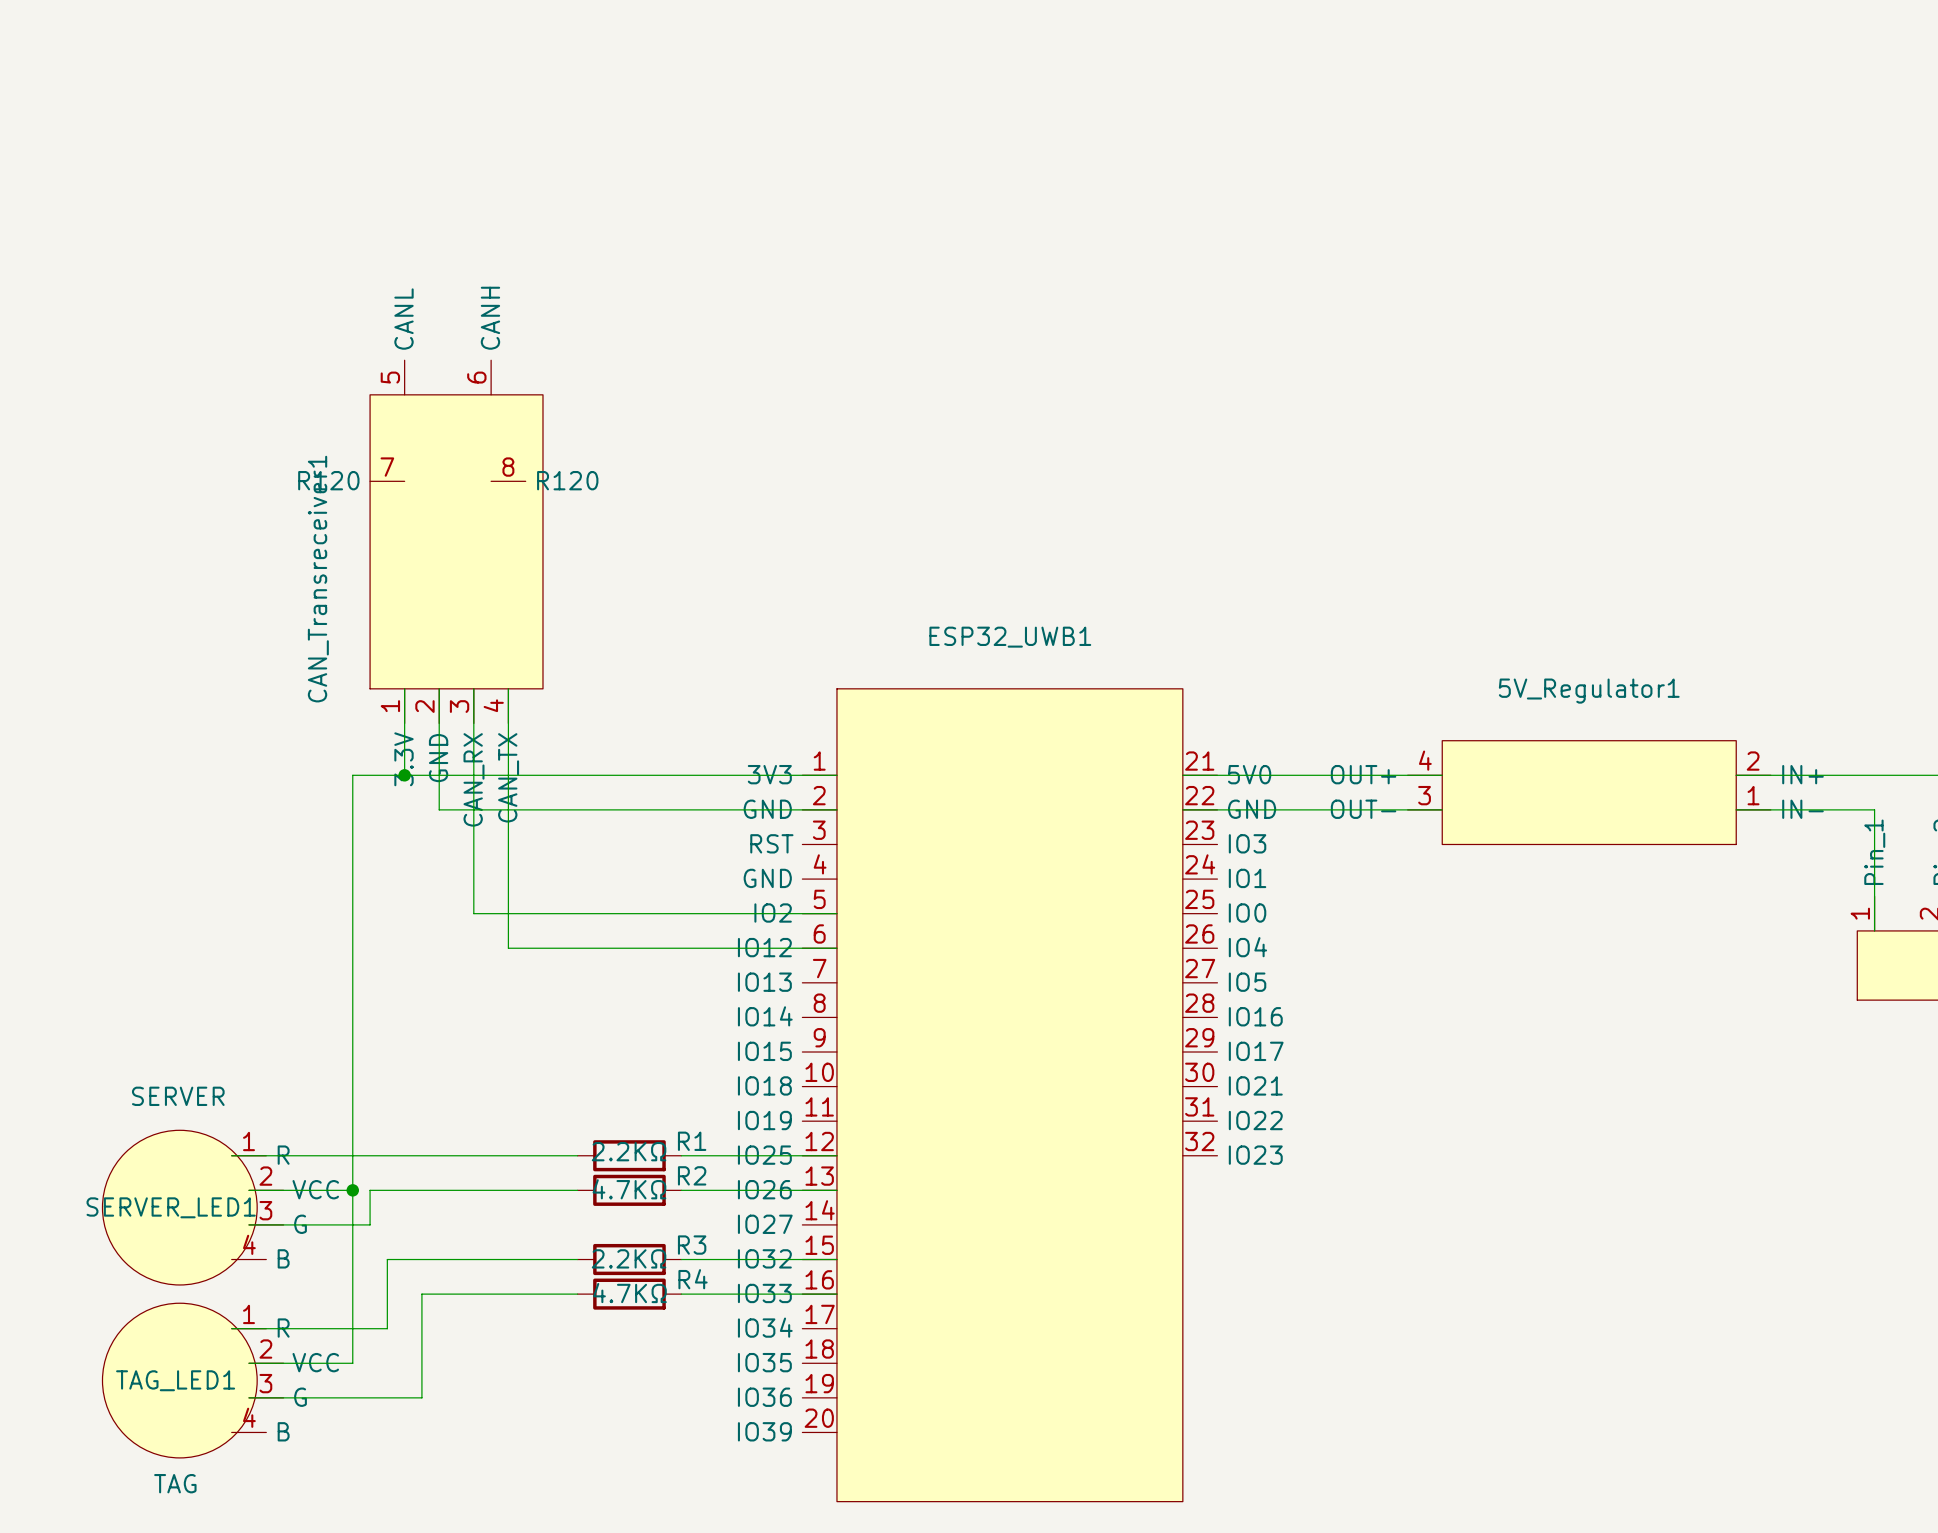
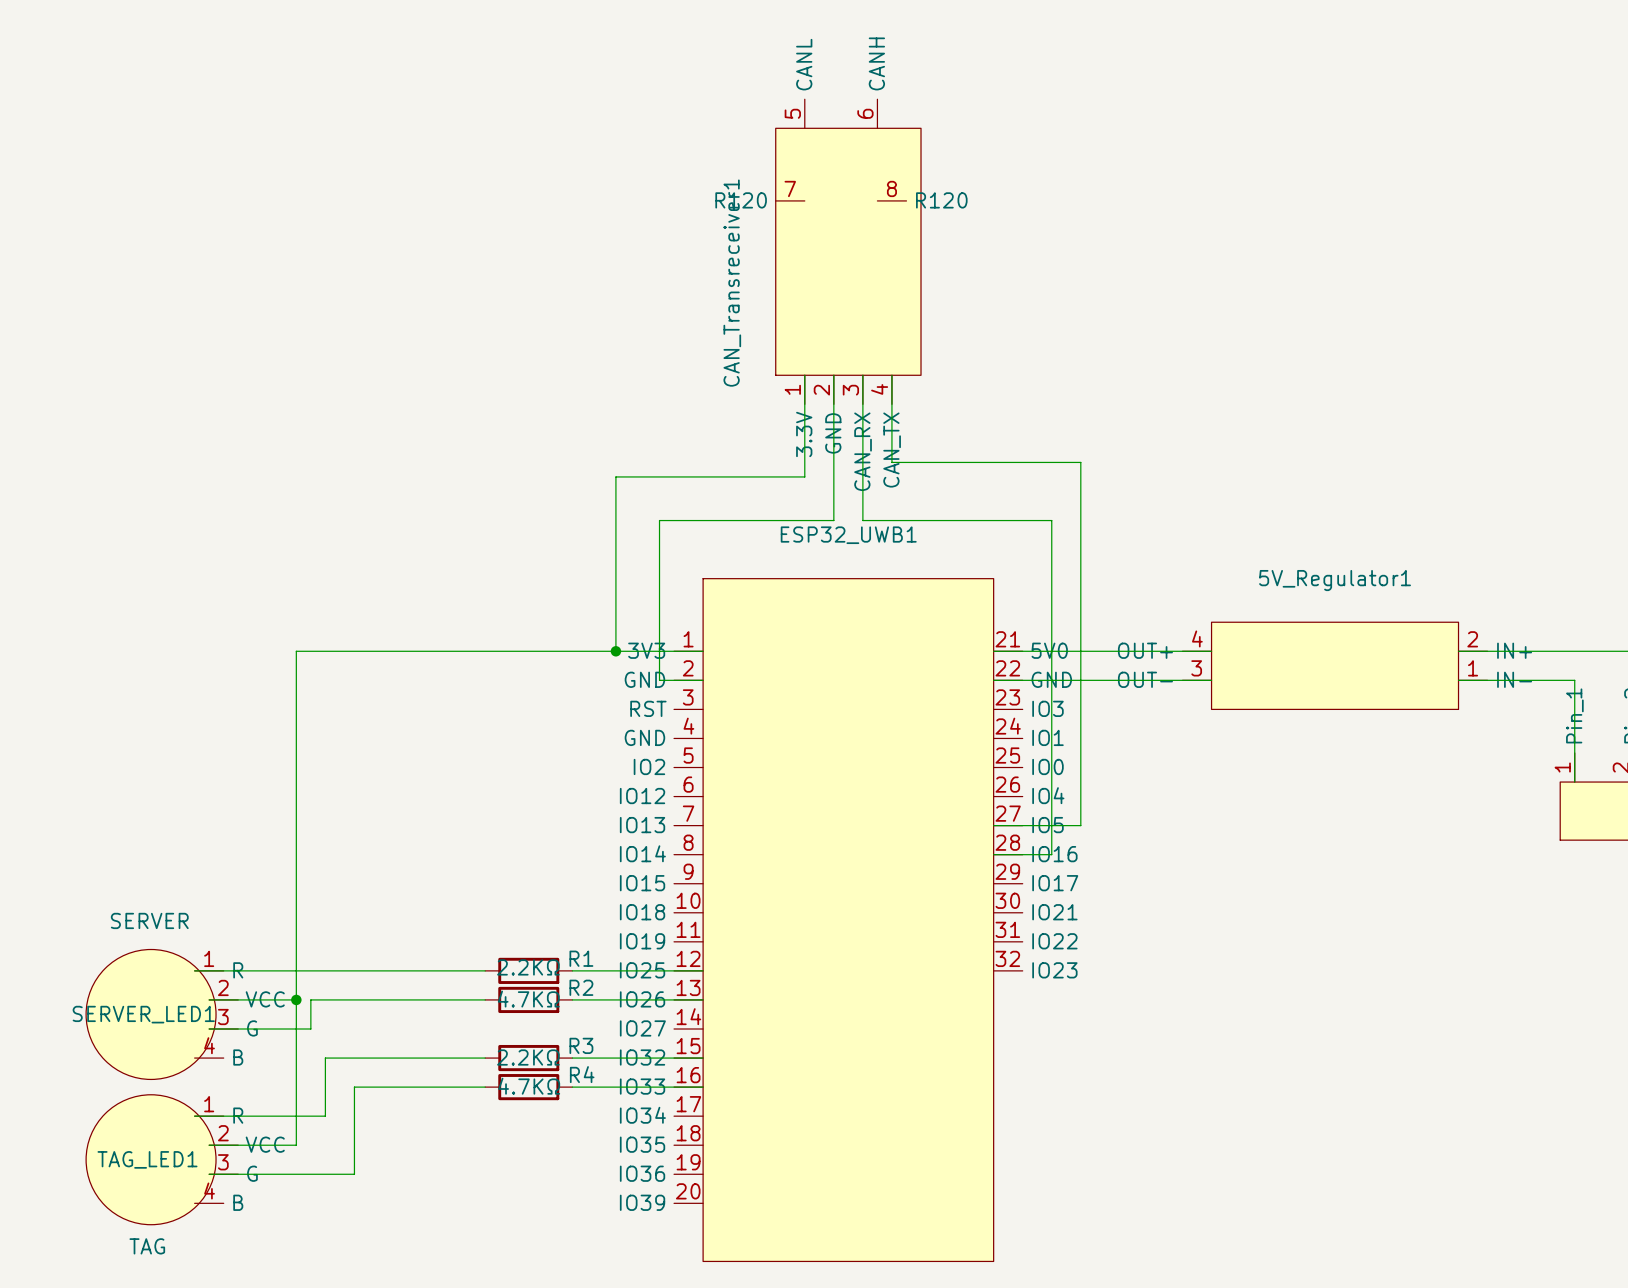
wire: none -> (804, 375) (804, 476) (615, 476) (615, 651)
wire: none -> (862, 375) (862, 520) (1051, 520) (1051, 854) (993, 854)
wire: none -> (891, 375) (891, 462) (1080, 462) (1080, 825) (993, 825)
CAN_Transreceiver1 position: (456, 541) -> (848, 251)
wire: (404, 688) (404, 775) -> none
wire: (439, 688) (439, 809) (785, 809) -> (833, 375) (833, 520) (659, 520) (659, 680)
wire: (473, 688) (473, 913) (836, 913) -> none
wire: (508, 688) (508, 948) (836, 948) -> none
junction: (404, 775) -> none
junction: none -> (615, 651)

